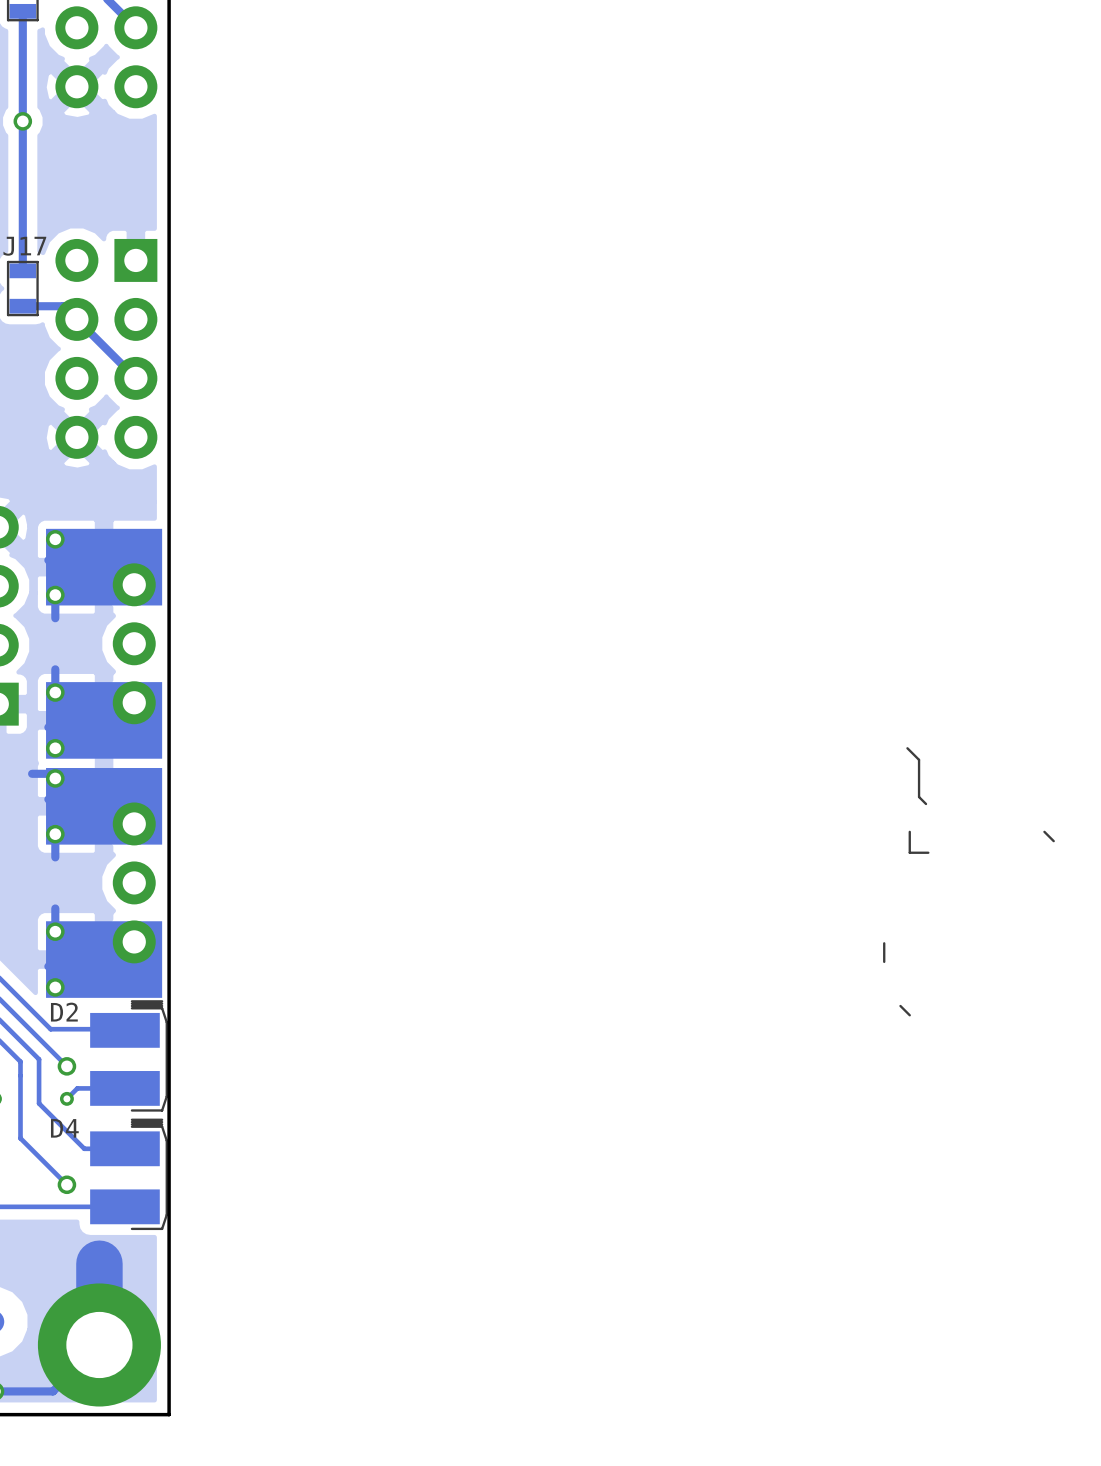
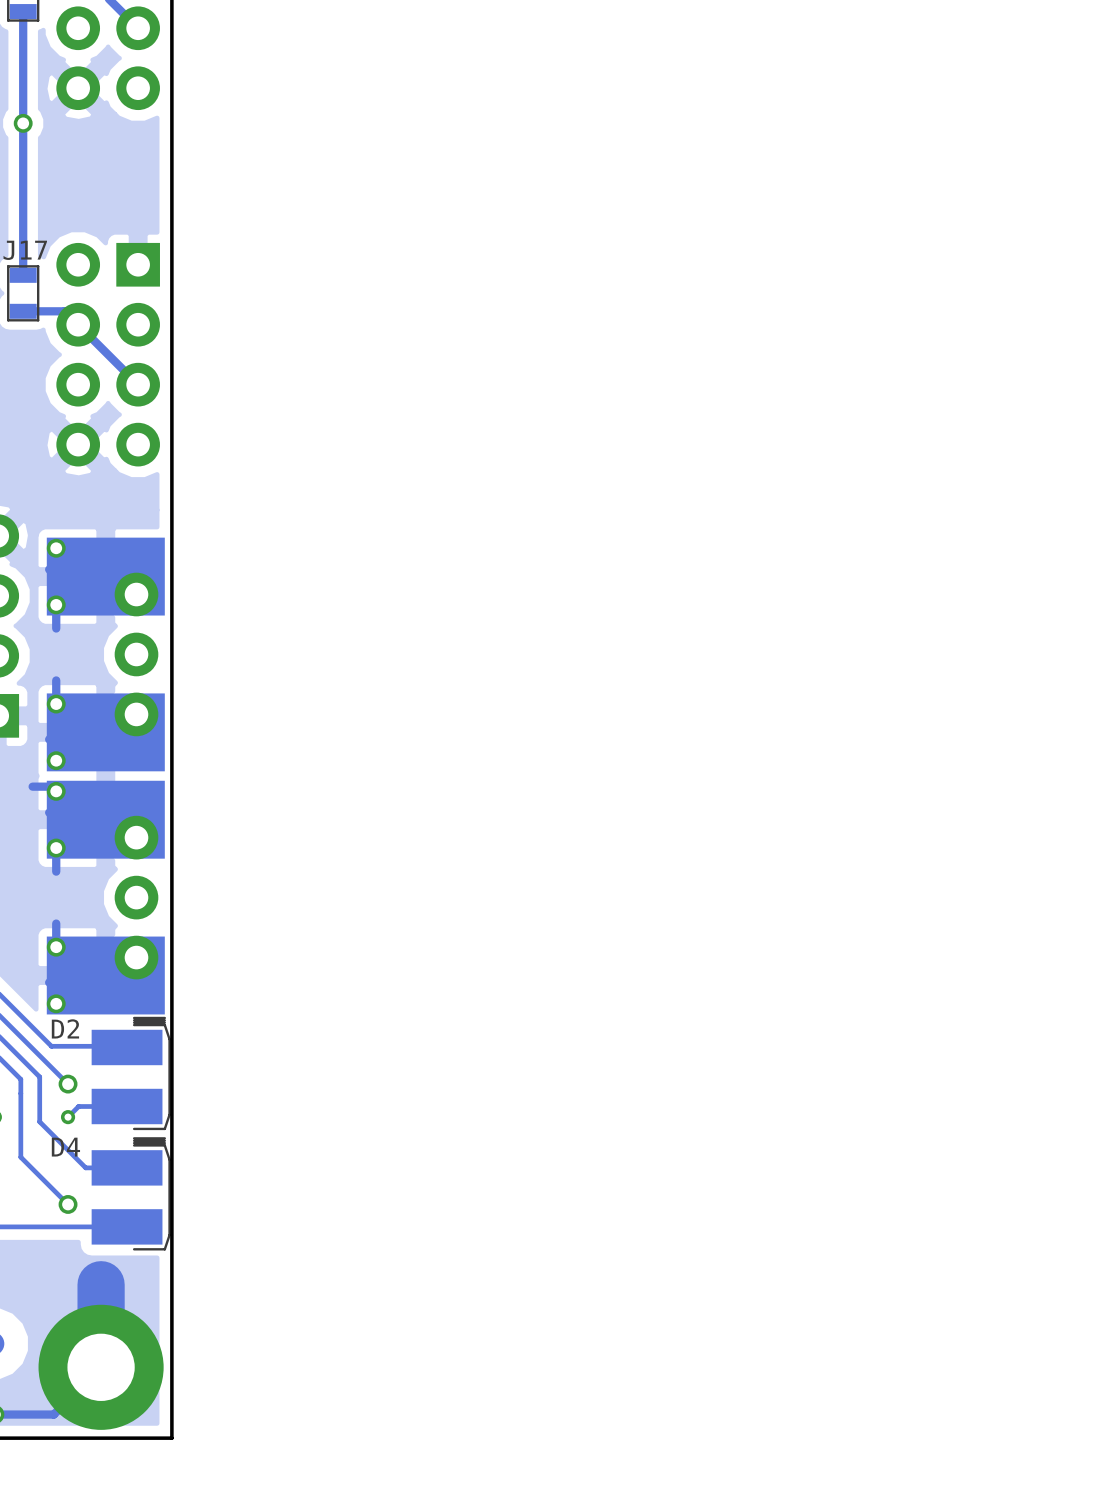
line: (907, 748) (919, 759) (919, 797) (926, 803) -> none
line: (909, 831) (909, 852) (928, 852) -> none
line: (1044, 831) (1053, 841) -> none
line: (884, 943) (884, 961) -> none
line: (900, 1005) (909, 1015) -> none

